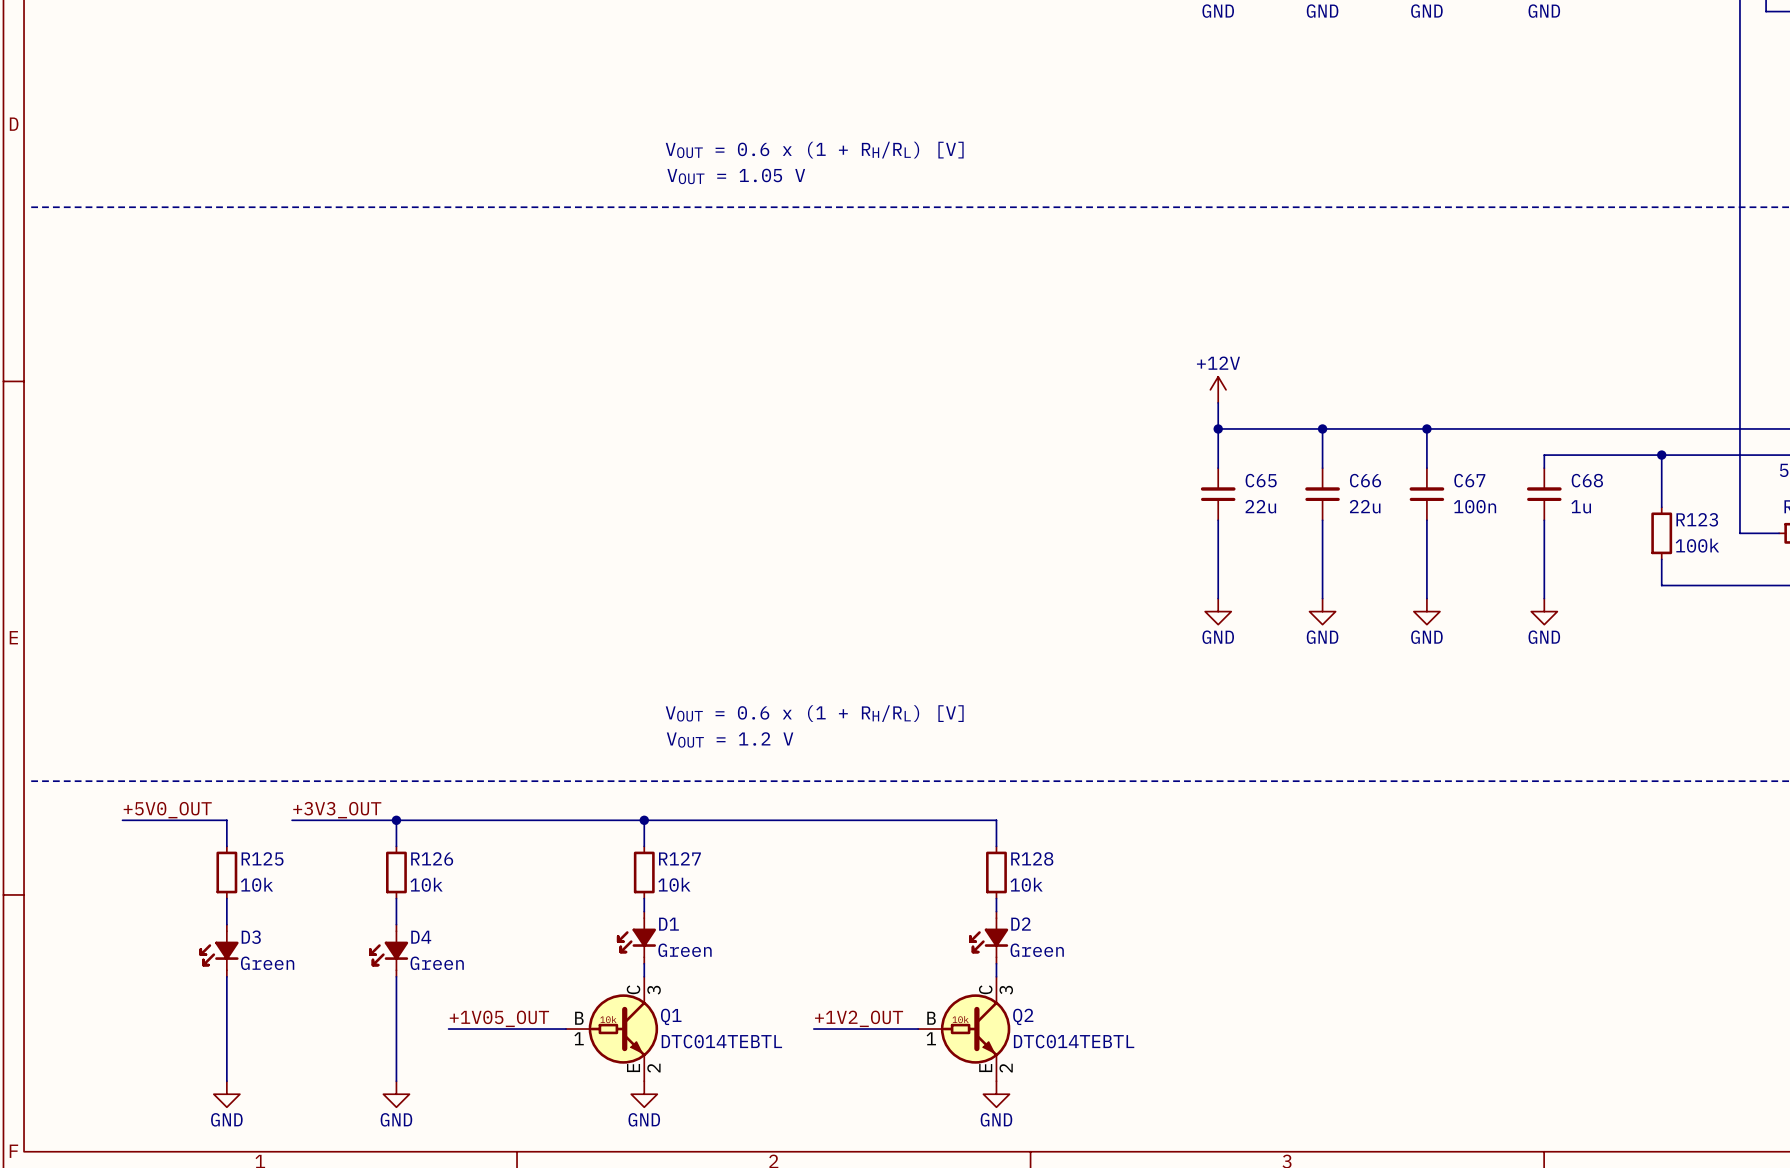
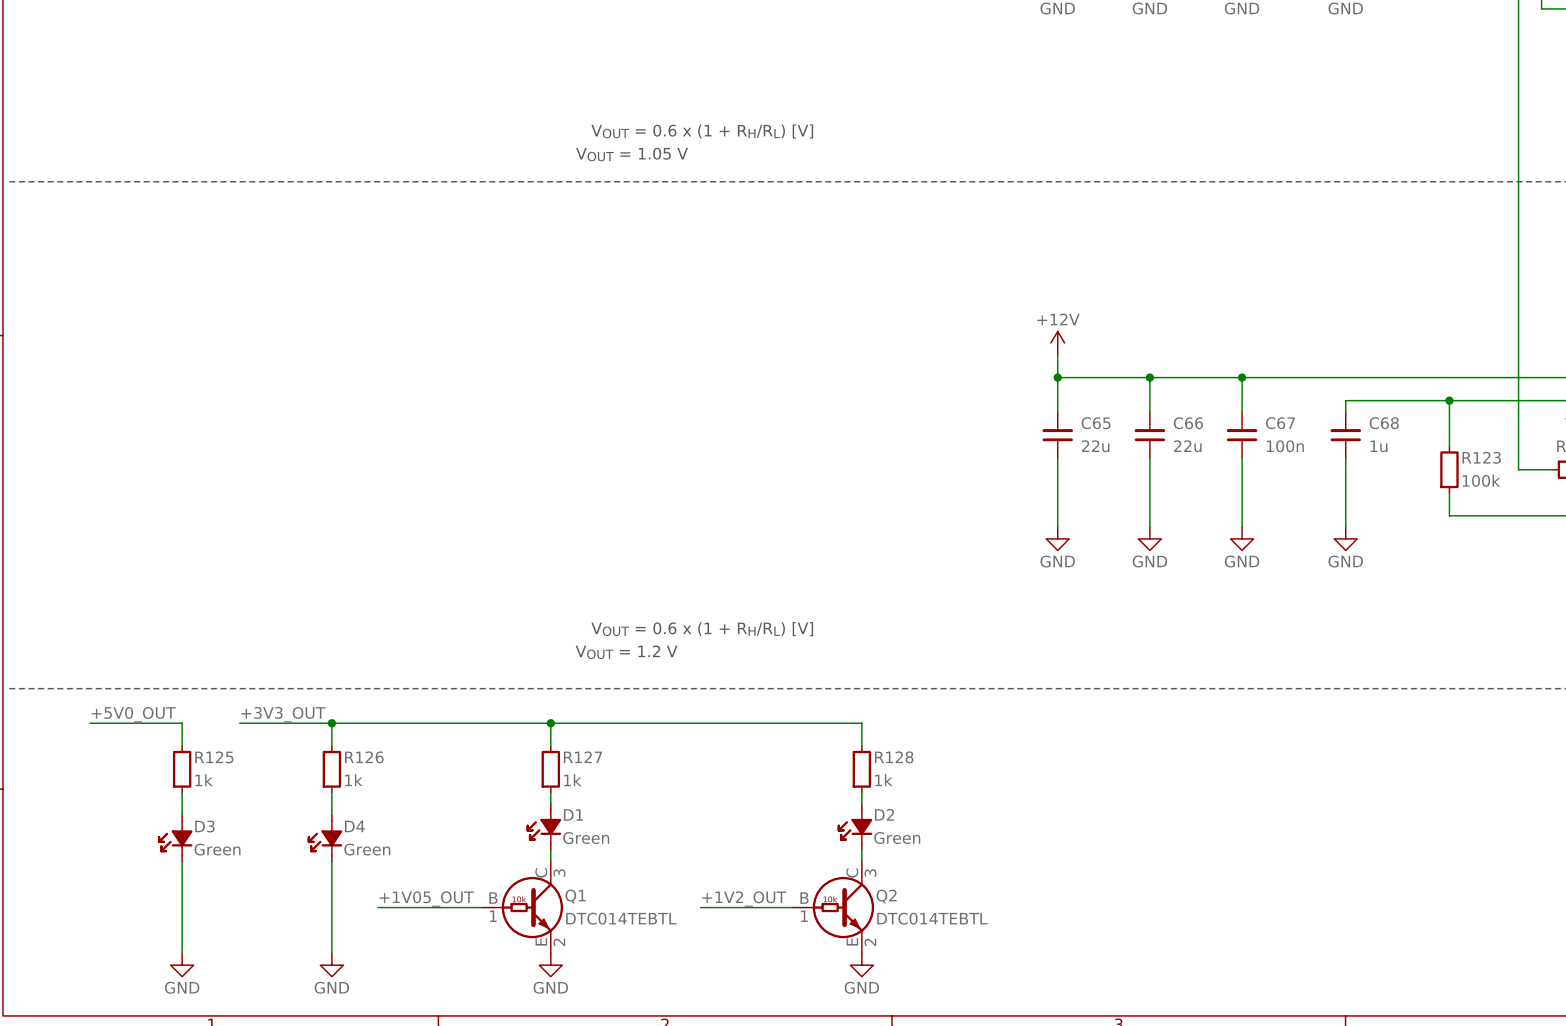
R125 text: 10k (256, 884) -> 1k (204, 780)
R126 text: 10k (426, 884) -> 1k (353, 780)
R127 text: 10k (674, 884) -> 1k (572, 780)
R128 text: 10k (1026, 884) -> 1k (883, 780)

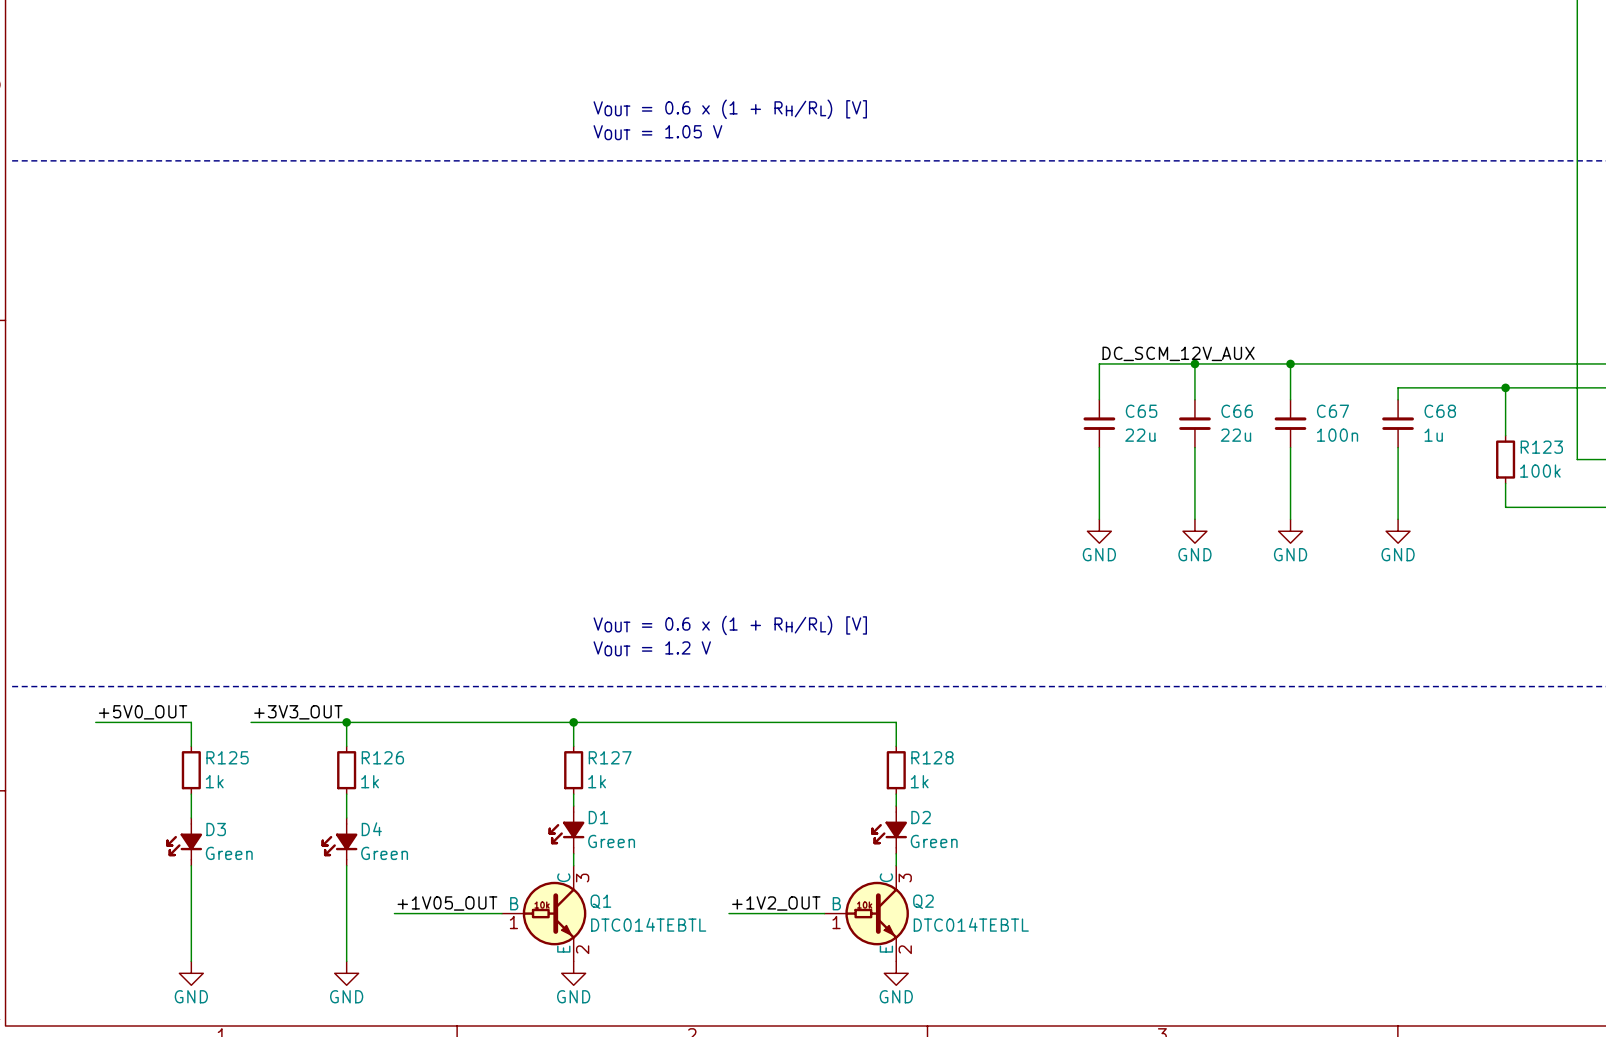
power symbol: +12V (1057, 343) -> none
wire: (1057, 354) (1057, 377) -> none
label: none -> DC_SCM_12V_AUX (1178, 353)
junction: (1057, 377) -> none

